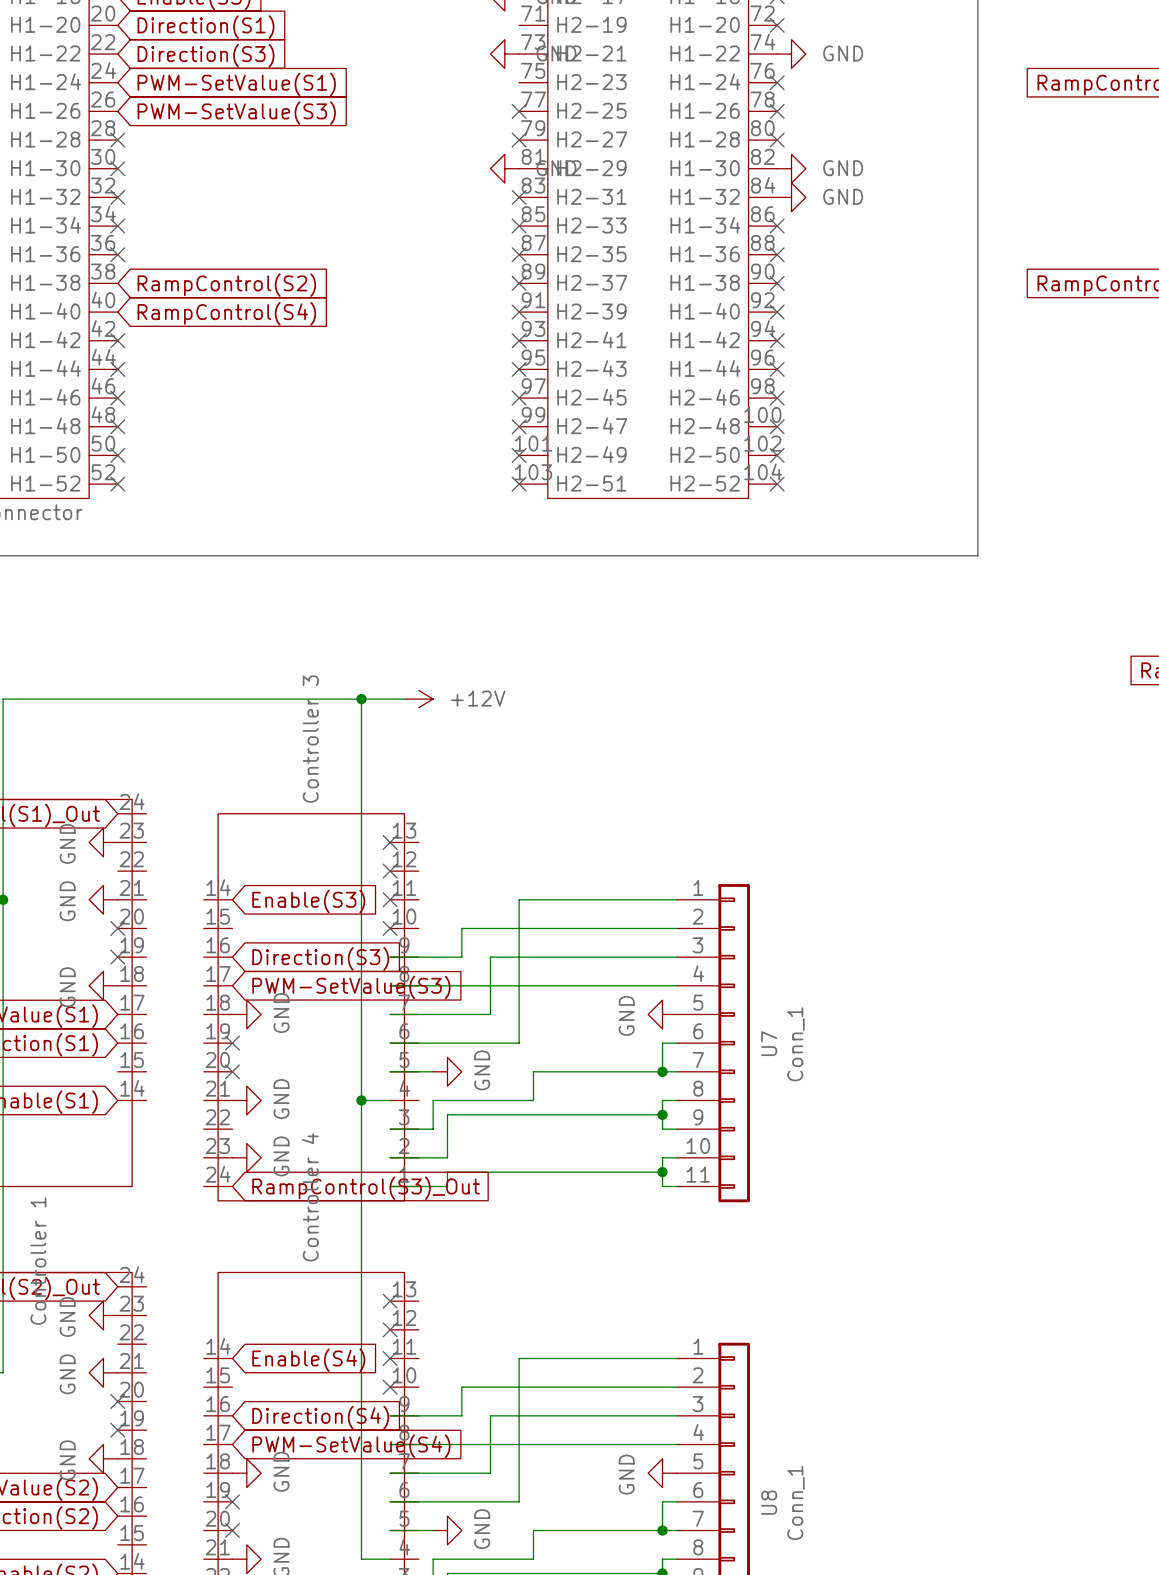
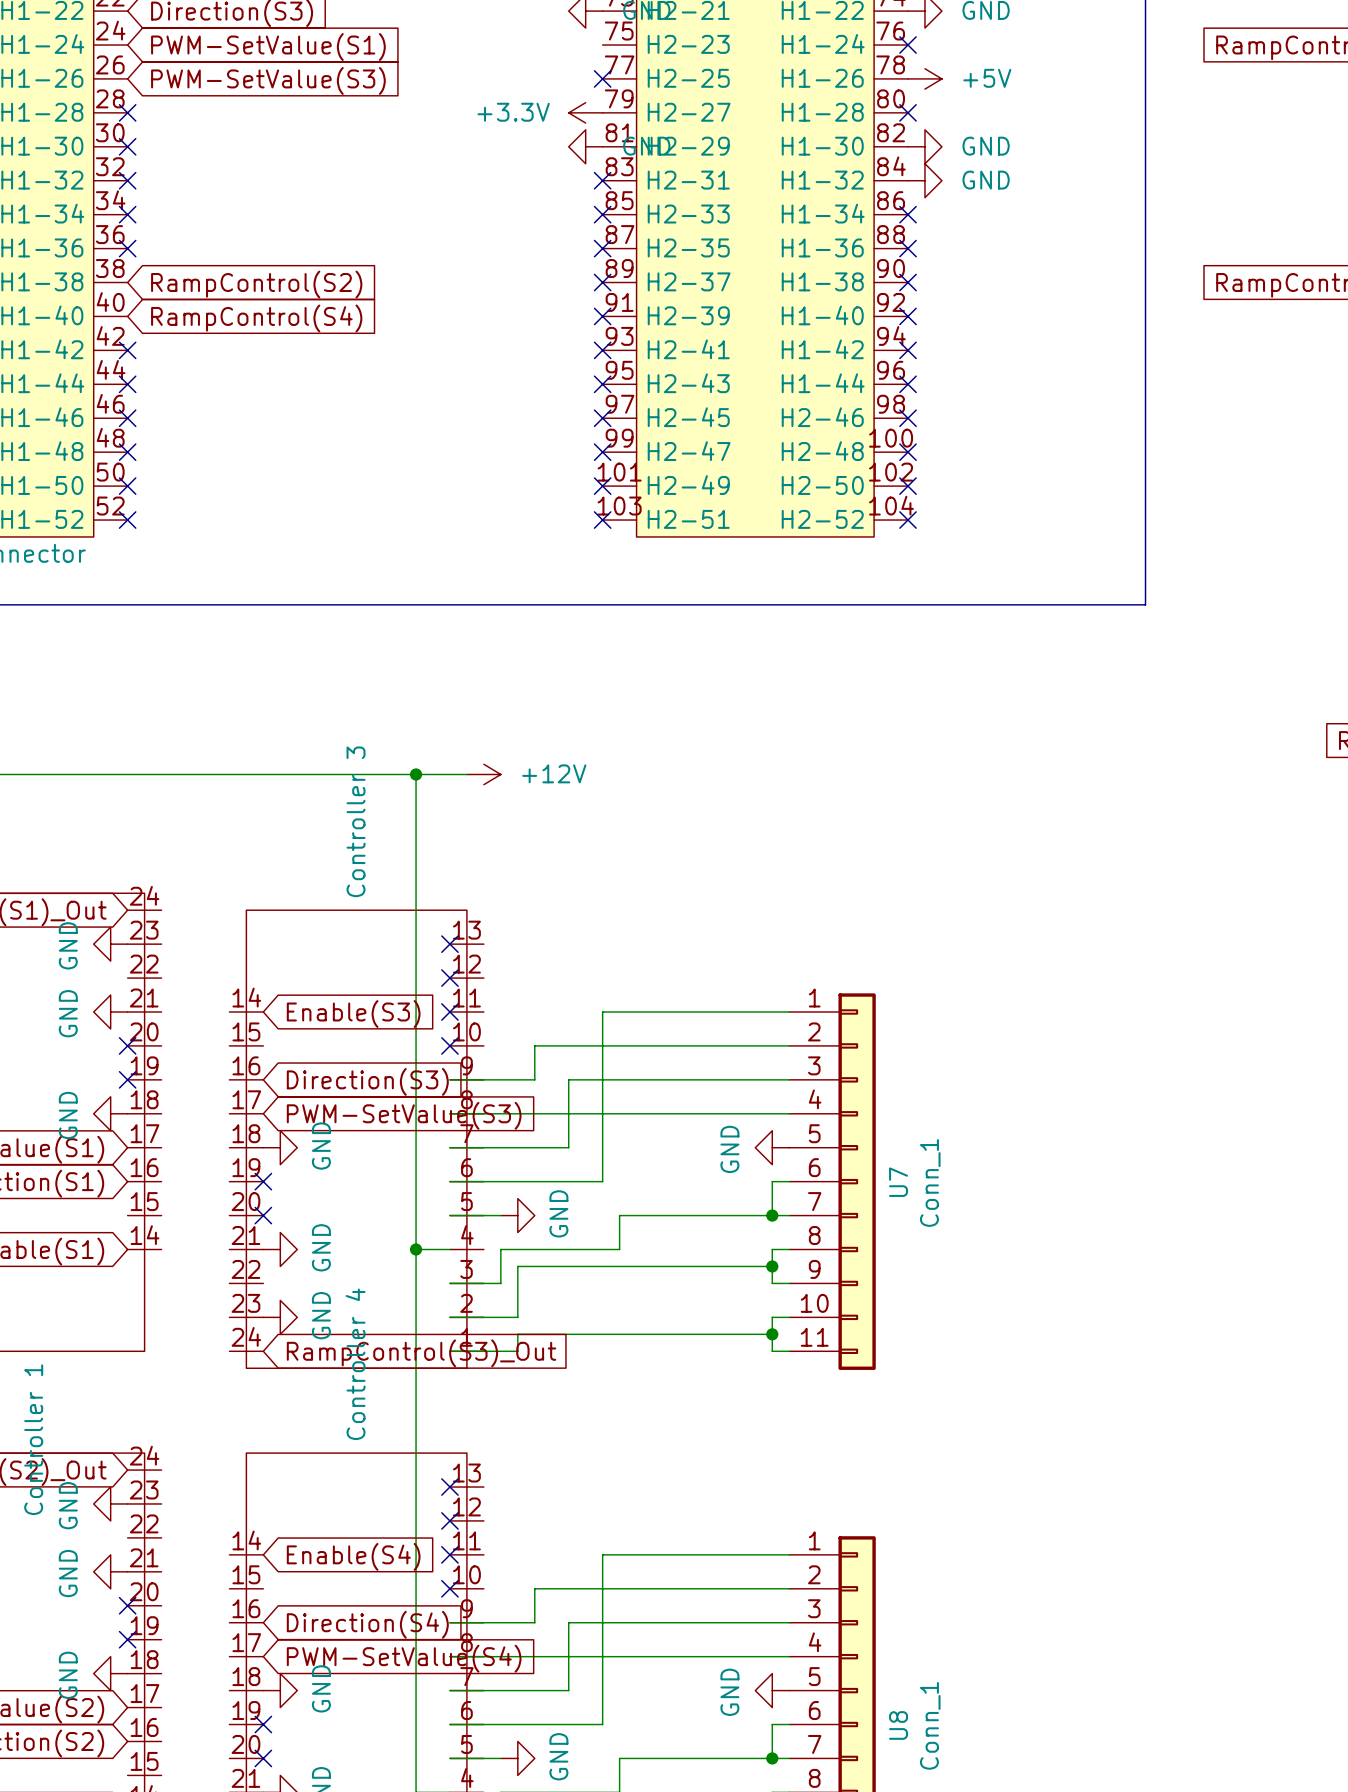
no-connect mark: (777, 111) -> none
power symbol: none -> +5V (924, 78)
power symbol: none -> +3.3V (585, 112)
no-connect mark: (519, 140) -> none

